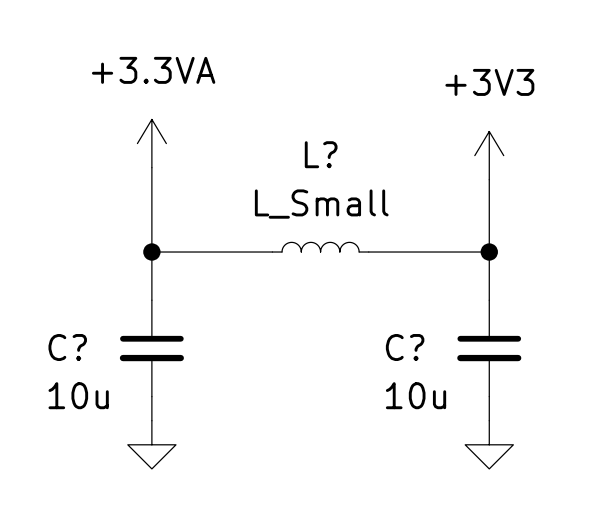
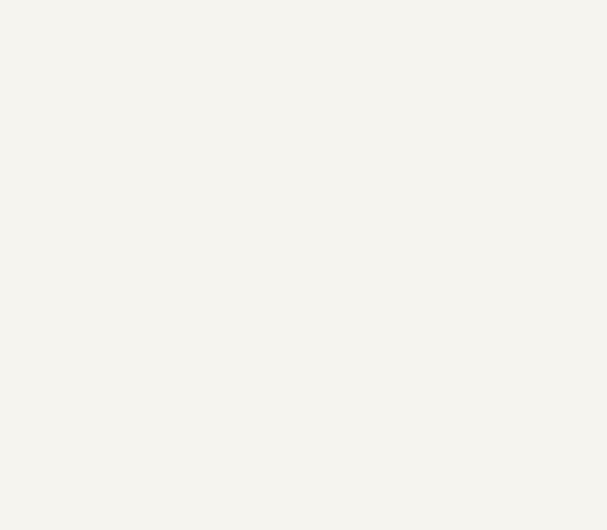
power symbol: +3.3VA (151, 143) -> none
power symbol: +3V3 (489, 155) -> none
wire: (151, 167) (151, 300) -> none
wire: (489, 179) (489, 300) -> none
L?: L_Small (320, 247) -> none
wire: (151, 252) (272, 252) -> none
junction: (151, 252) -> none
wire: (368, 252) (489, 252) -> none
junction: (489, 252) -> none
C?: 10u (151, 348) -> none
C?: 10u (489, 348) -> none
wire: (151, 396) (151, 420) -> none
wire: (489, 396) (489, 420) -> none
power symbol: (151, 444) -> none
power symbol: (489, 444) -> none

